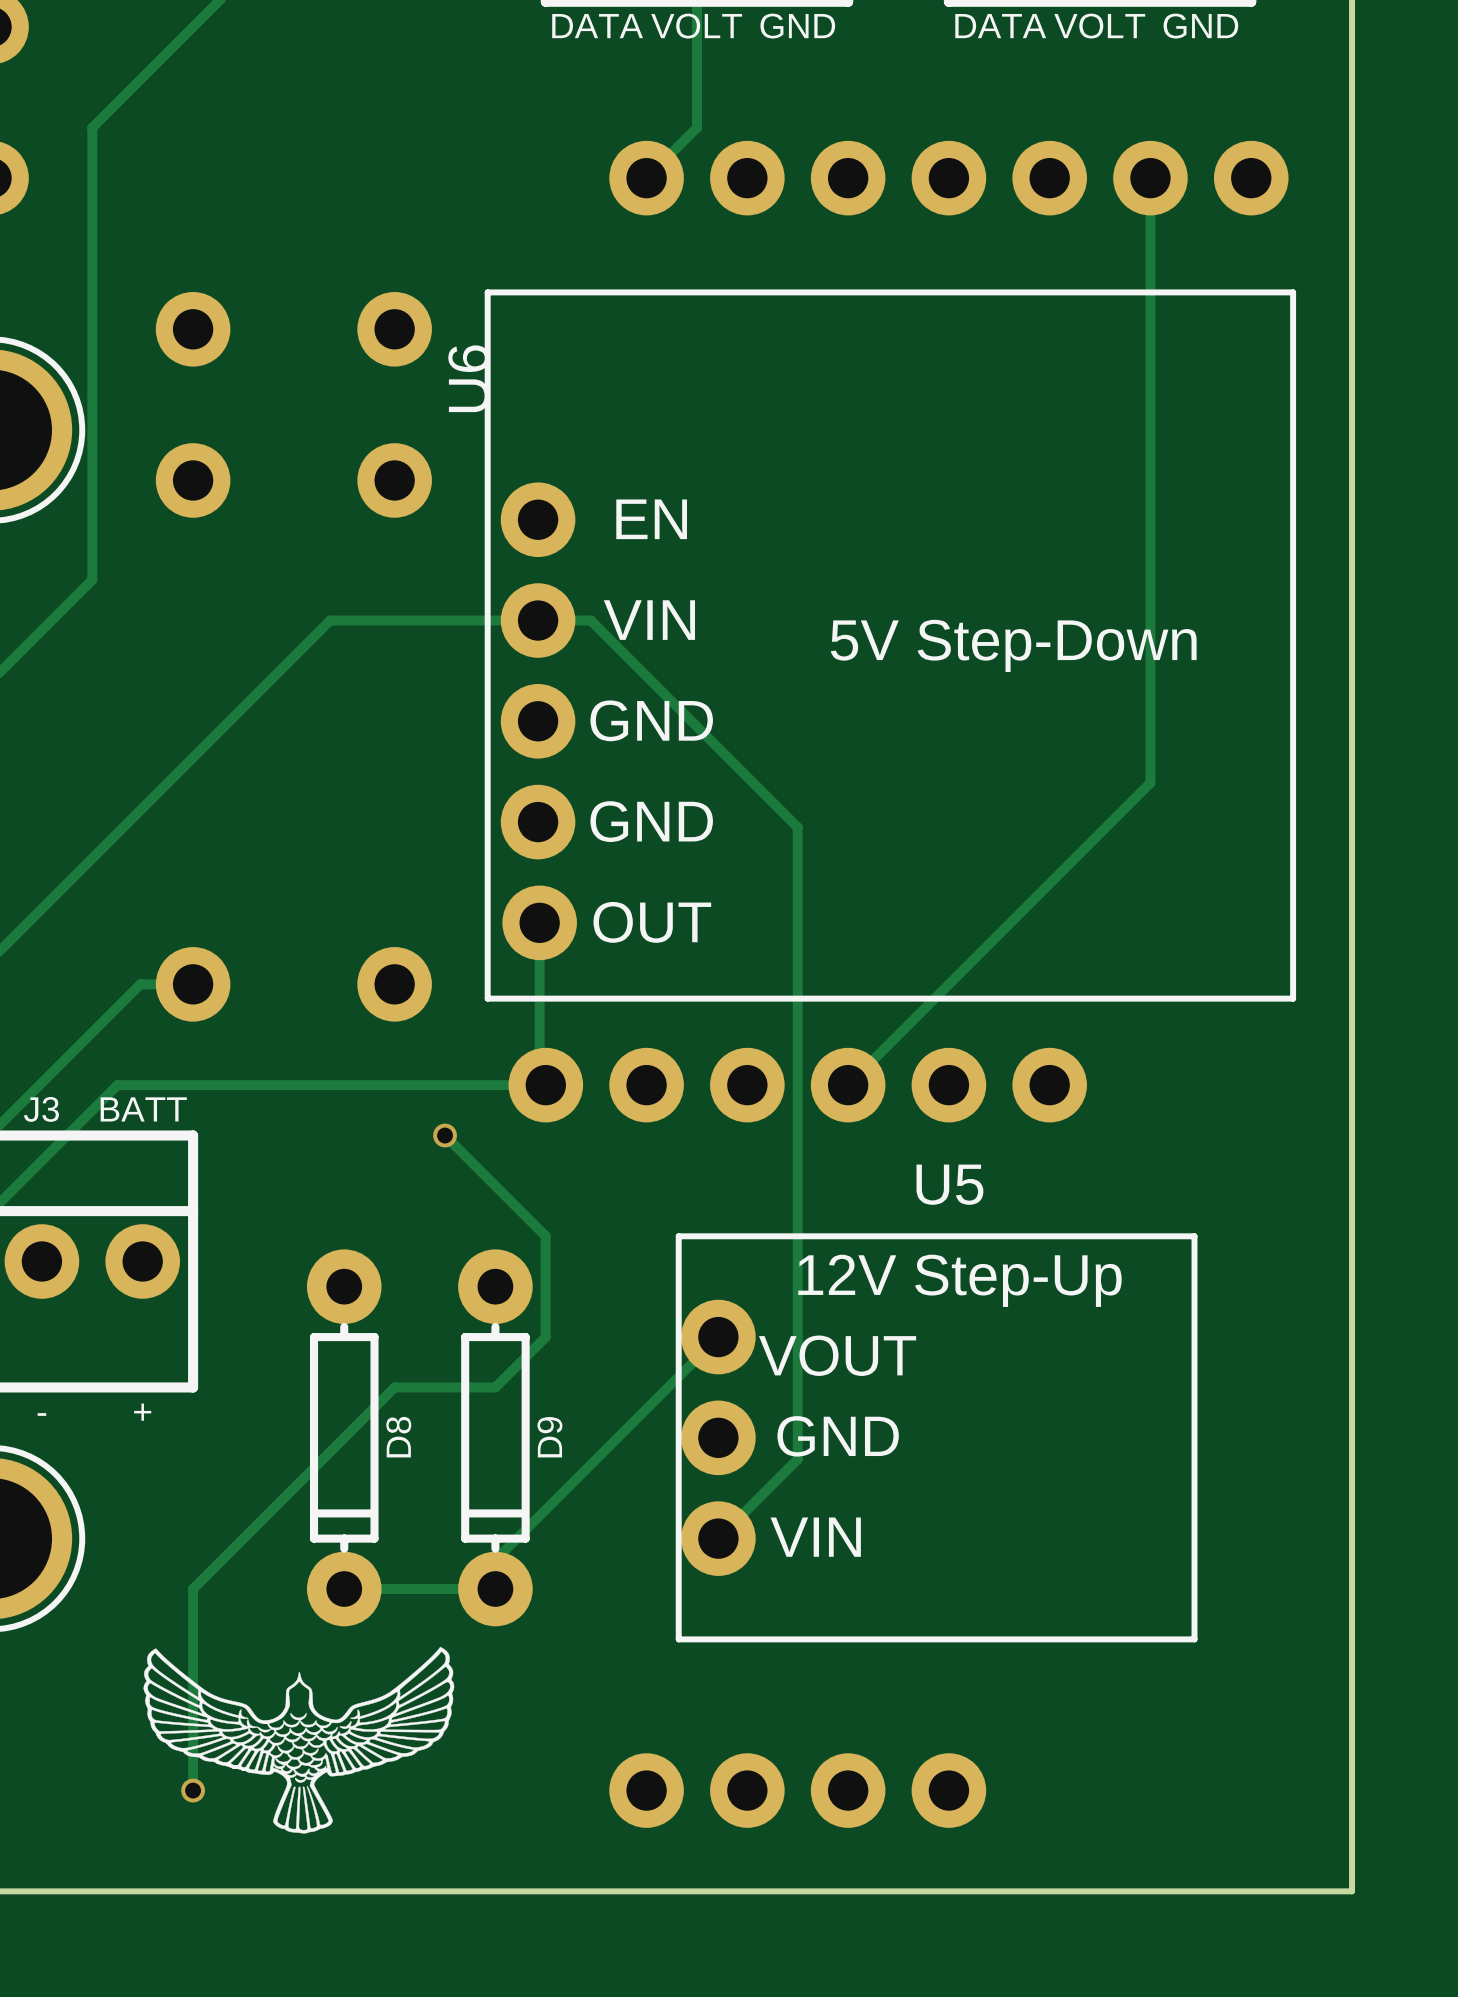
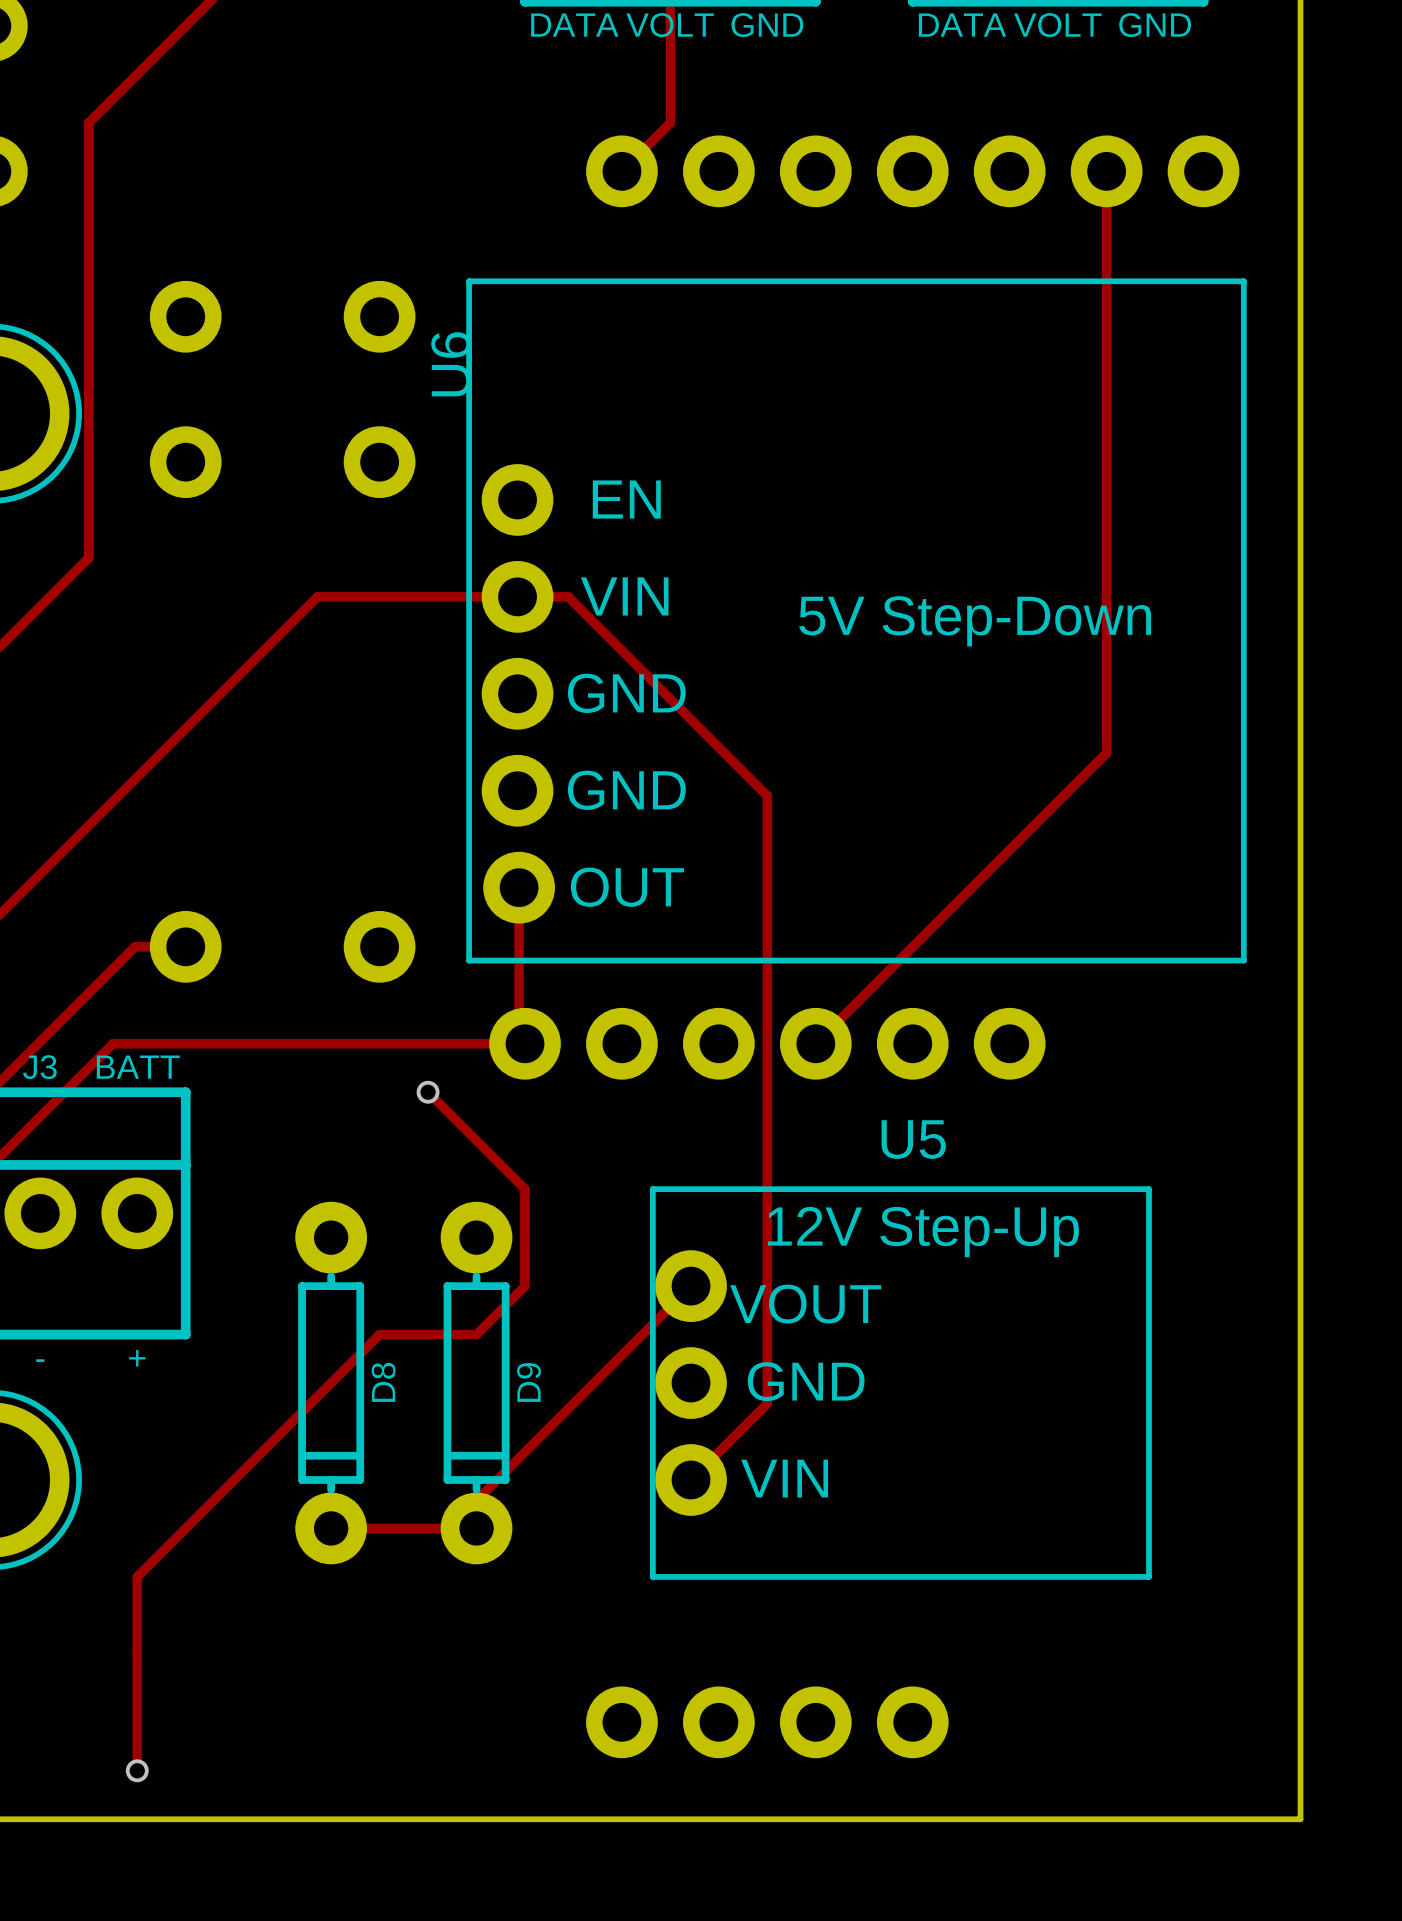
track: (193, 1589) (193, 1790) -> (185, 1528) (137, 1576) (137, 1770)
drawing: [143, 1646, 455, 1834] -> none
via position: (193, 1790) -> (137, 1770)

